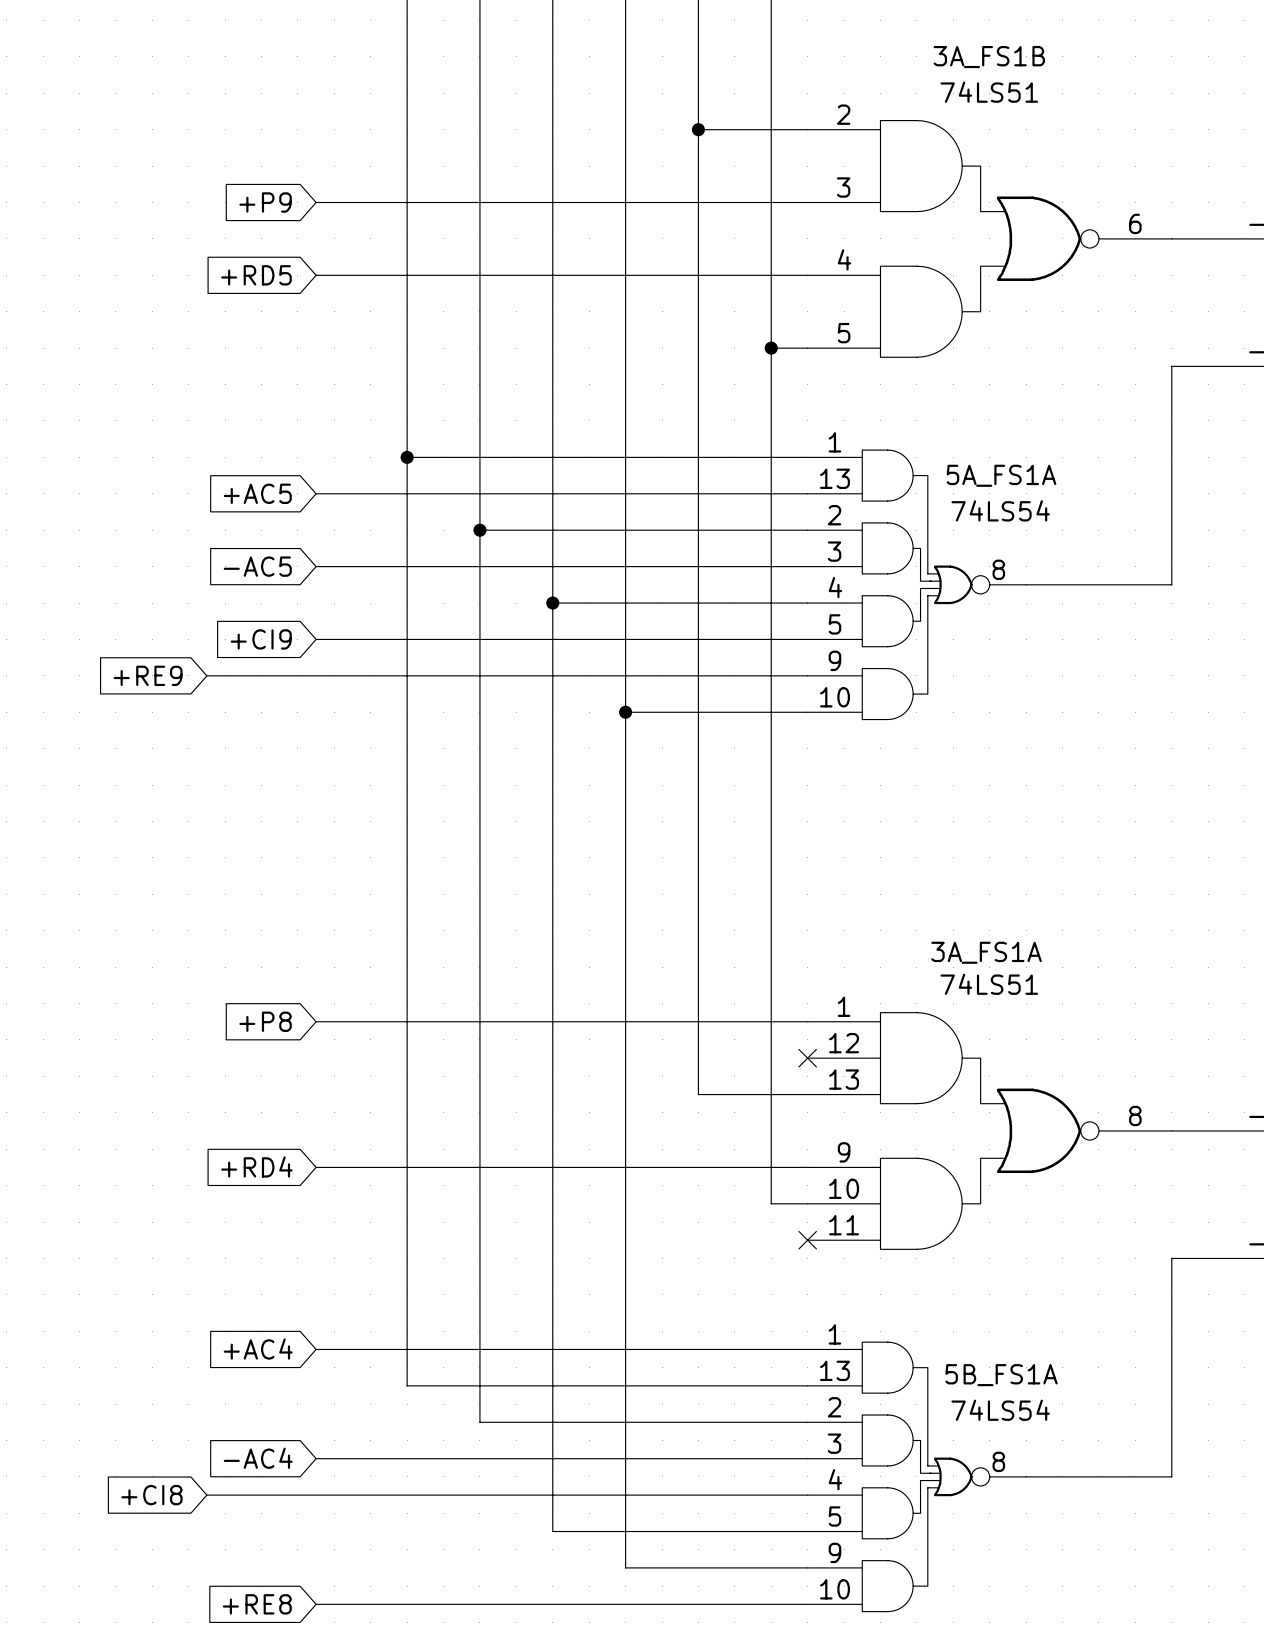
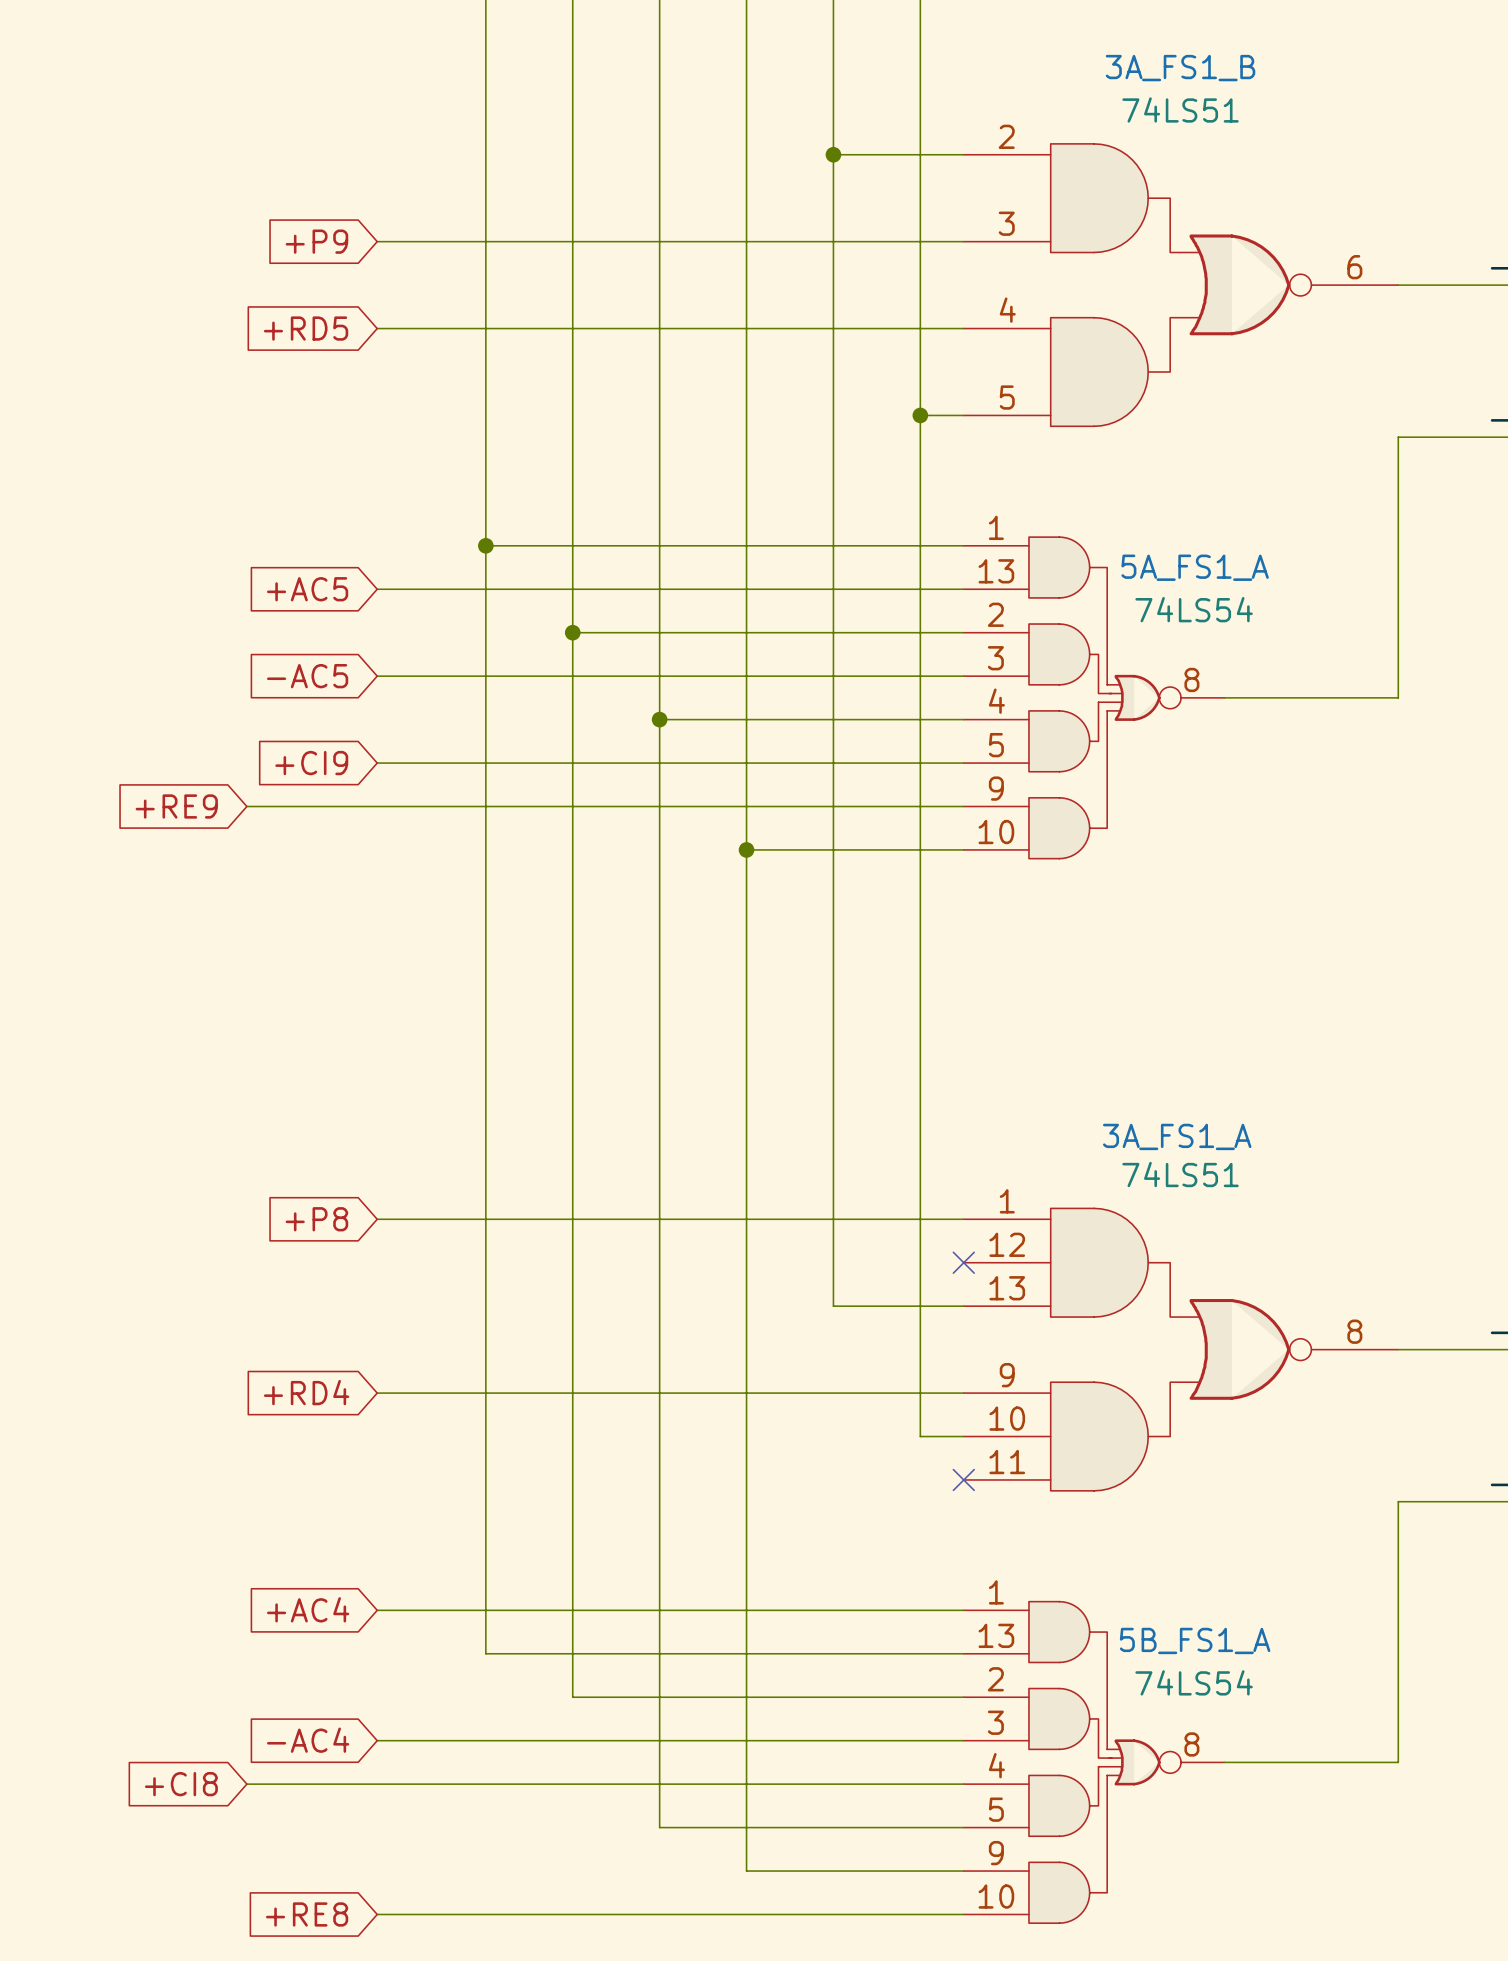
3A_FS1B name: 3A_FS1B (989, 57) -> 3A_FS1_B (1180, 68)
5A_FS1A name: 5A_FS1A (1001, 475) -> 5A_FS1_A (1195, 567)
3A_FS1A name: 3A_FS1A (986, 952) -> 3A_FS1_A (1177, 1136)
5B_FS1A name: 5B_FS1A (1001, 1375) -> 5B_FS1_A (1195, 1640)

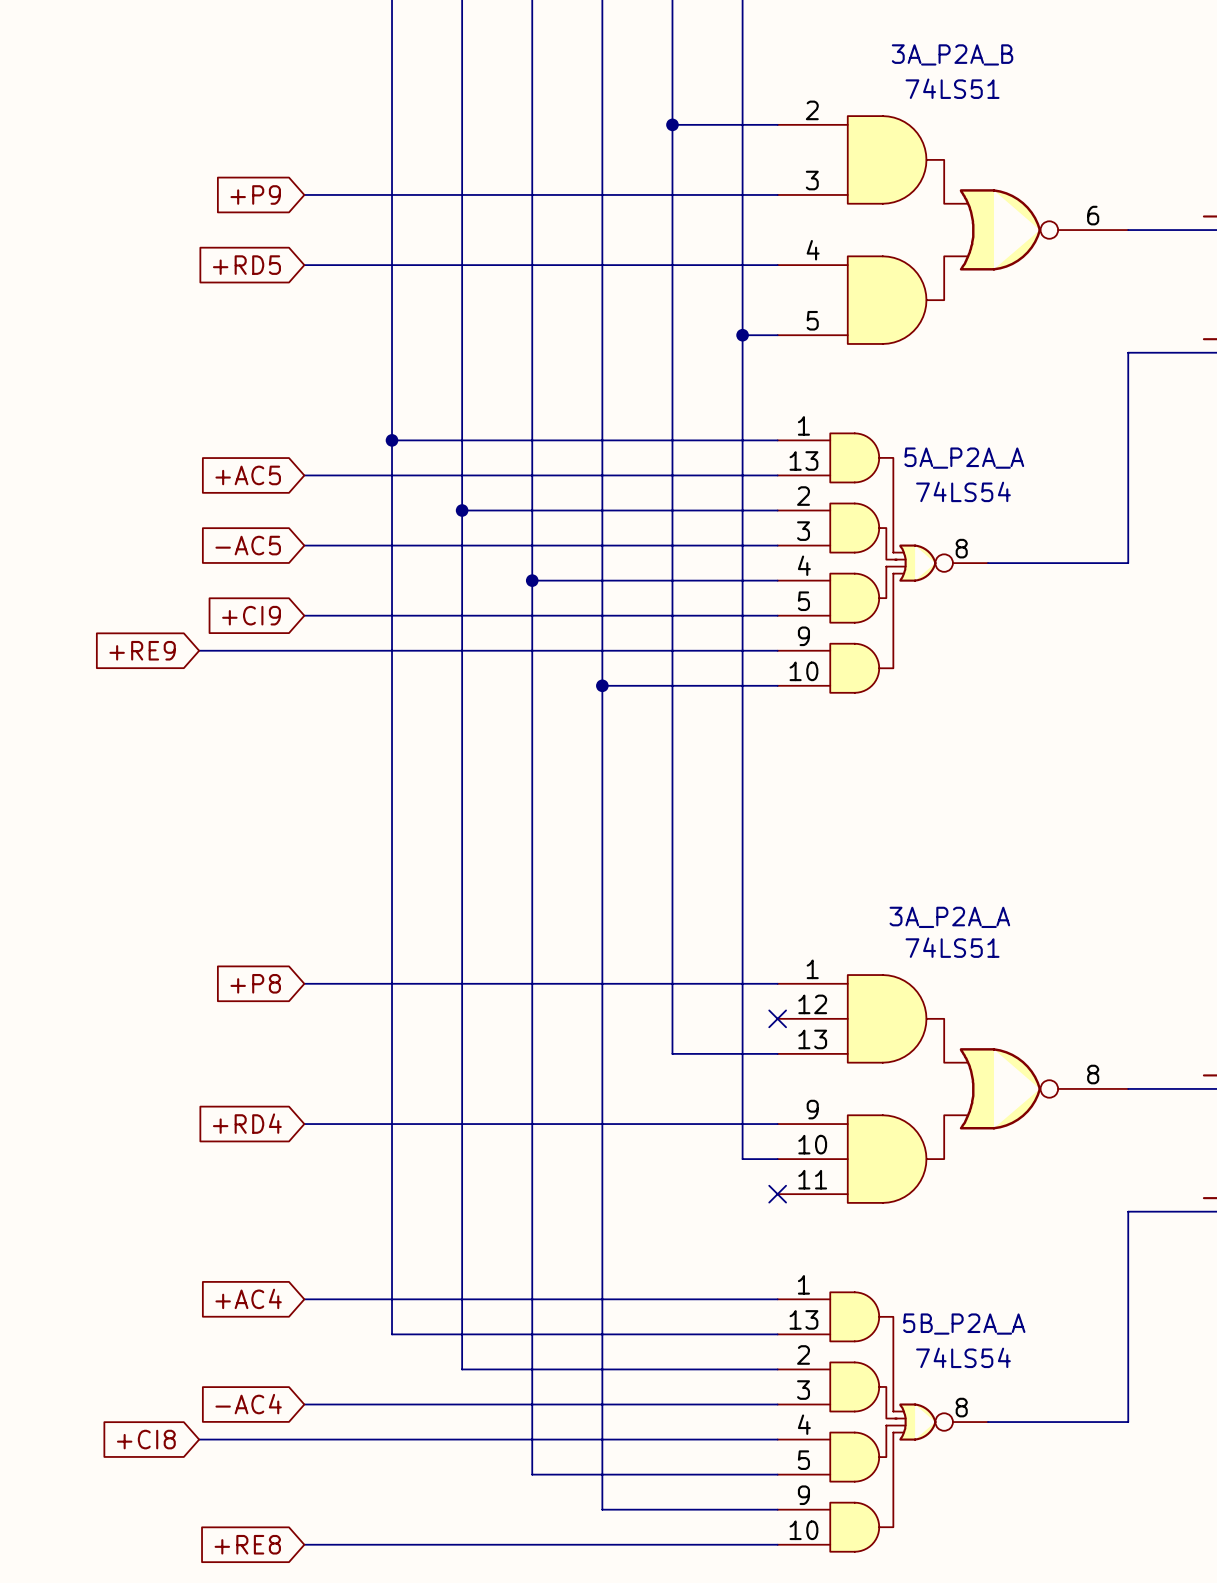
3A_FS1_B name: 3A_FS1_B (1180, 68) -> 3A_P2A_B (952, 54)
5A_FS1_A name: 5A_FS1_A (1195, 567) -> 5A_P2A_A (964, 458)
3A_FS1_A name: 3A_FS1_A (1177, 1136) -> 3A_P2A_A (949, 917)
5B_FS1_A name: 5B_FS1_A (1195, 1640) -> 5B_P2A_A (964, 1324)

